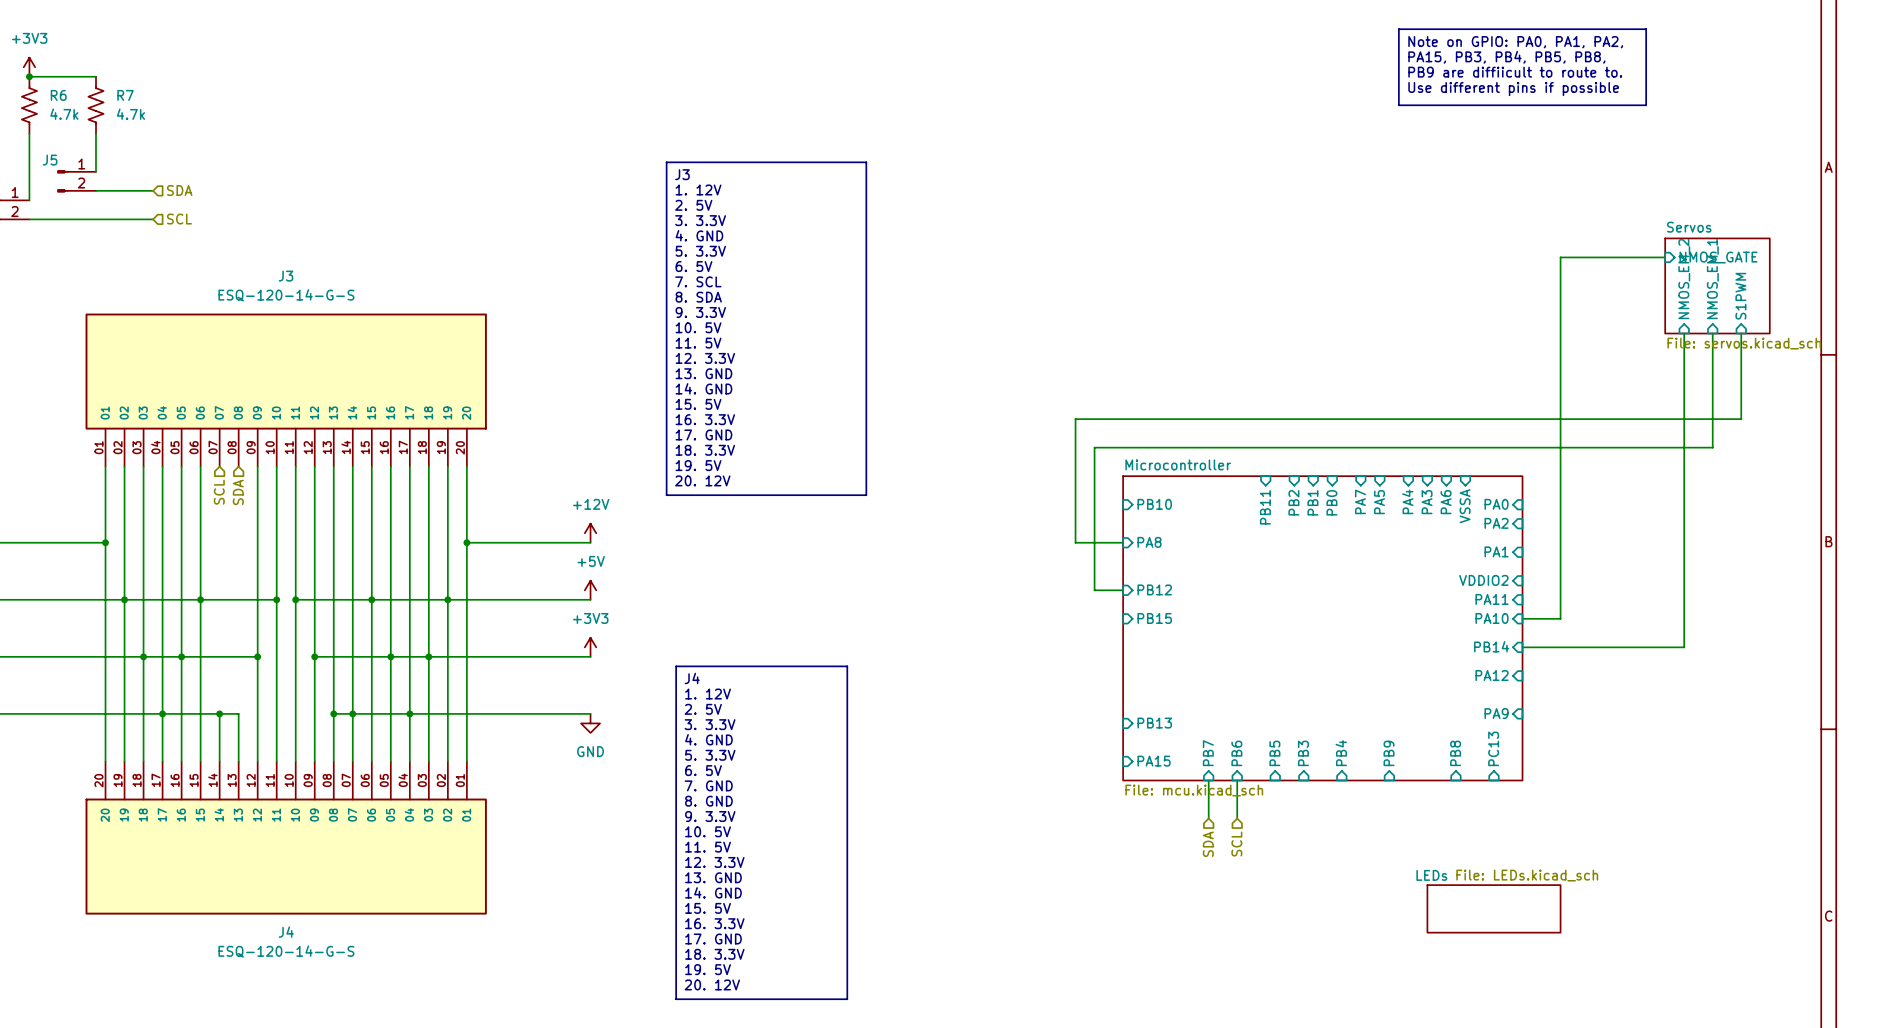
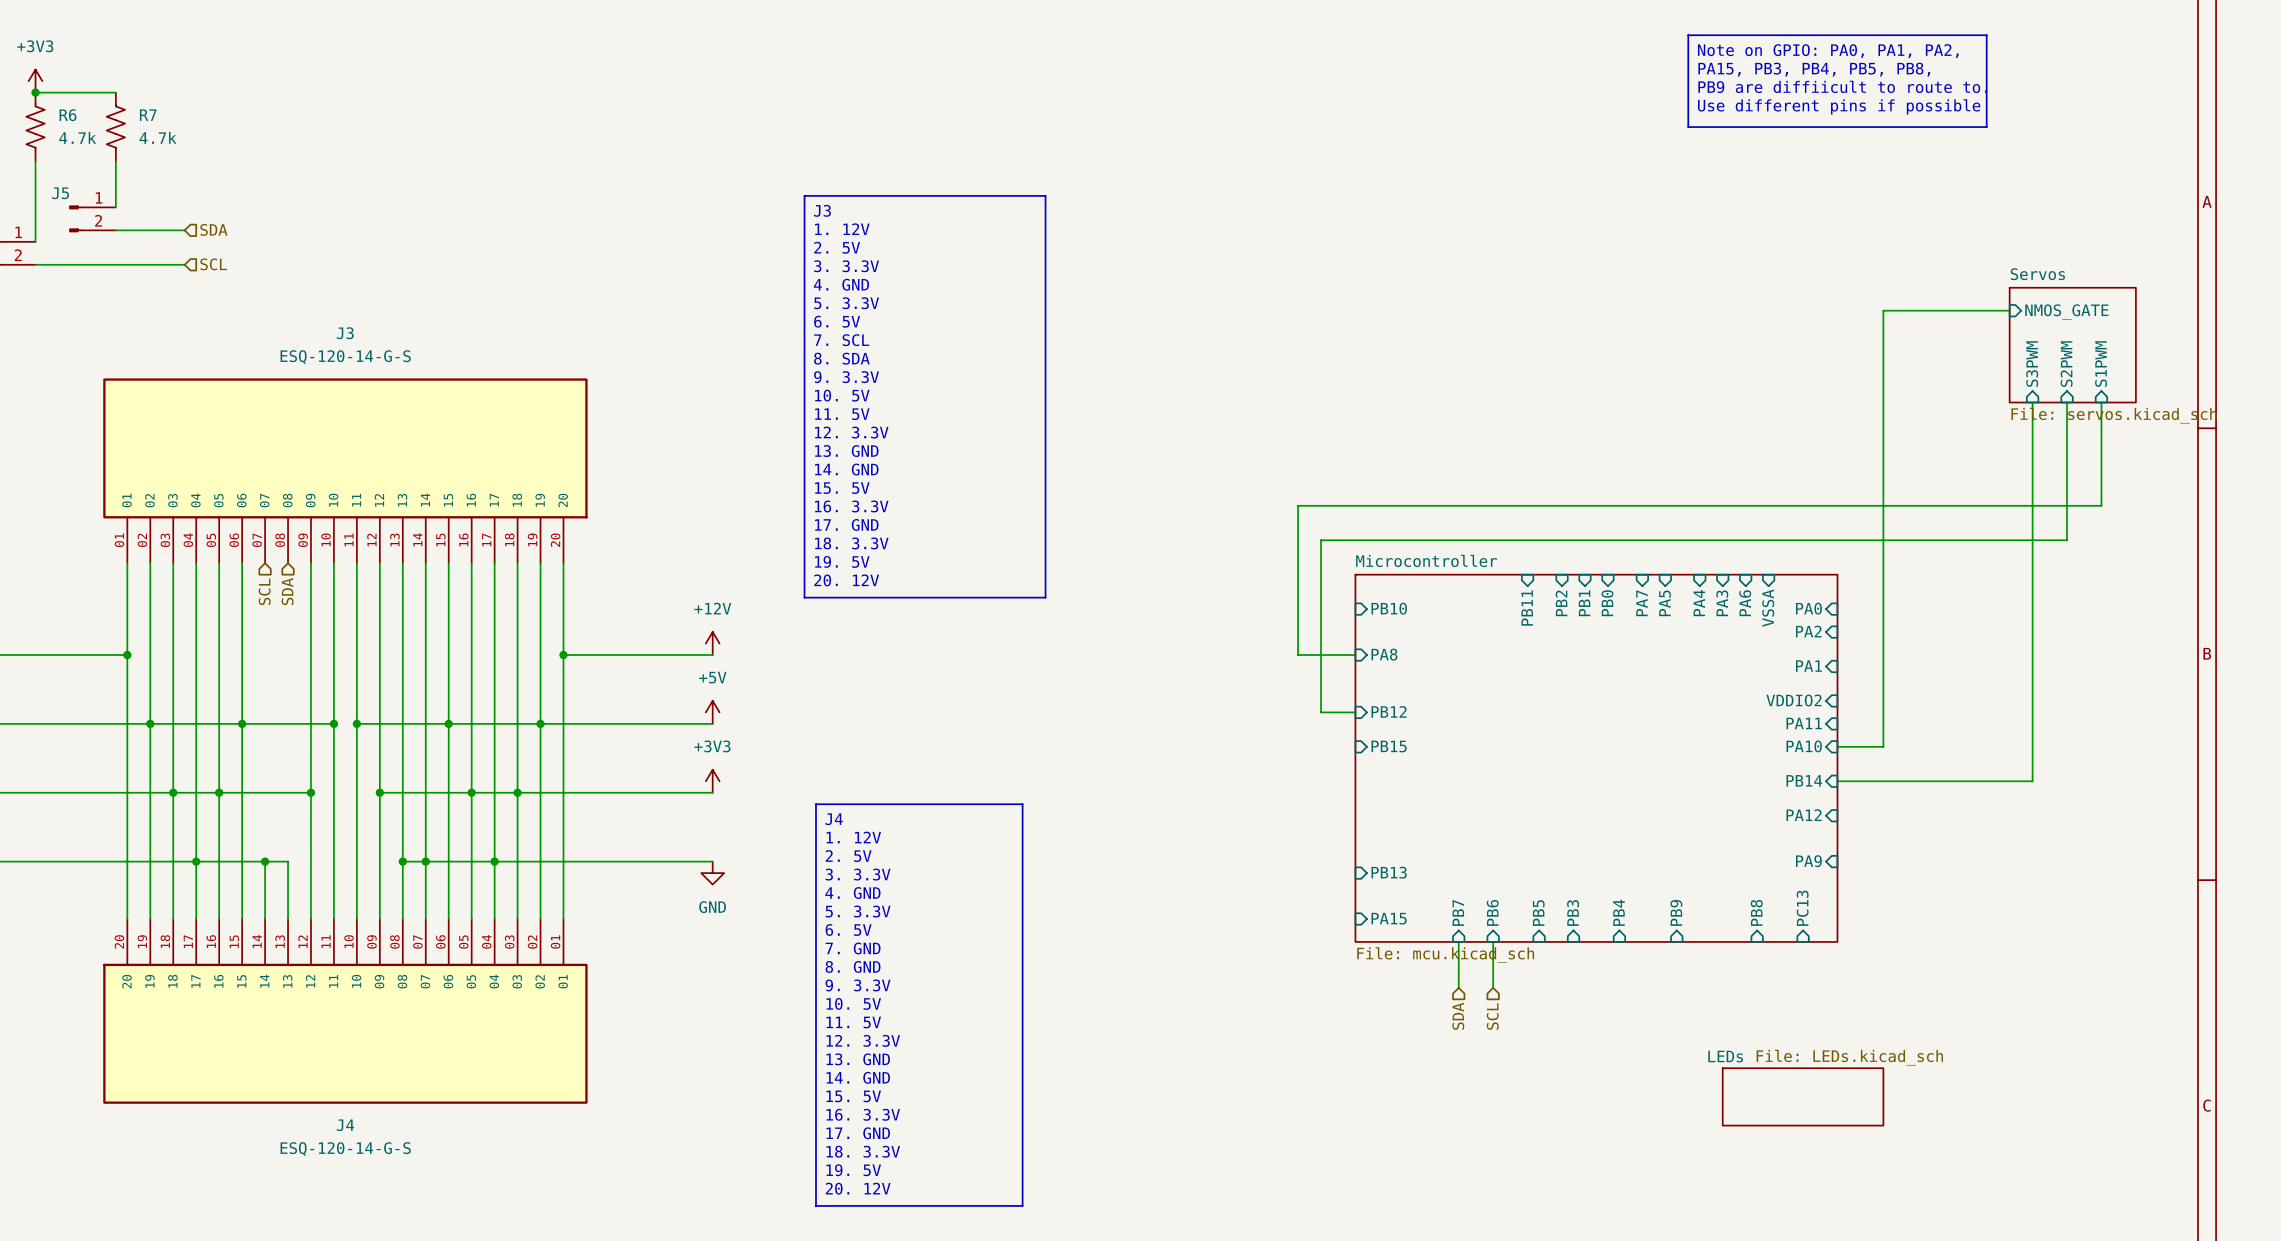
sheet pin: NMOS_EM_2 (1684, 279) -> S3PWM (2032, 364)
sheet pin: NMOS_EM_1 (1712, 279) -> S2PWM (2066, 364)

